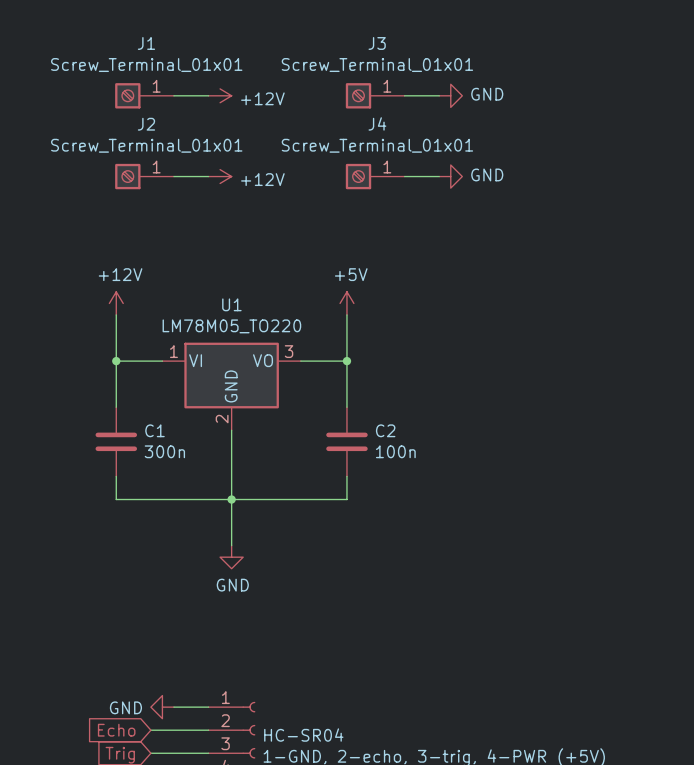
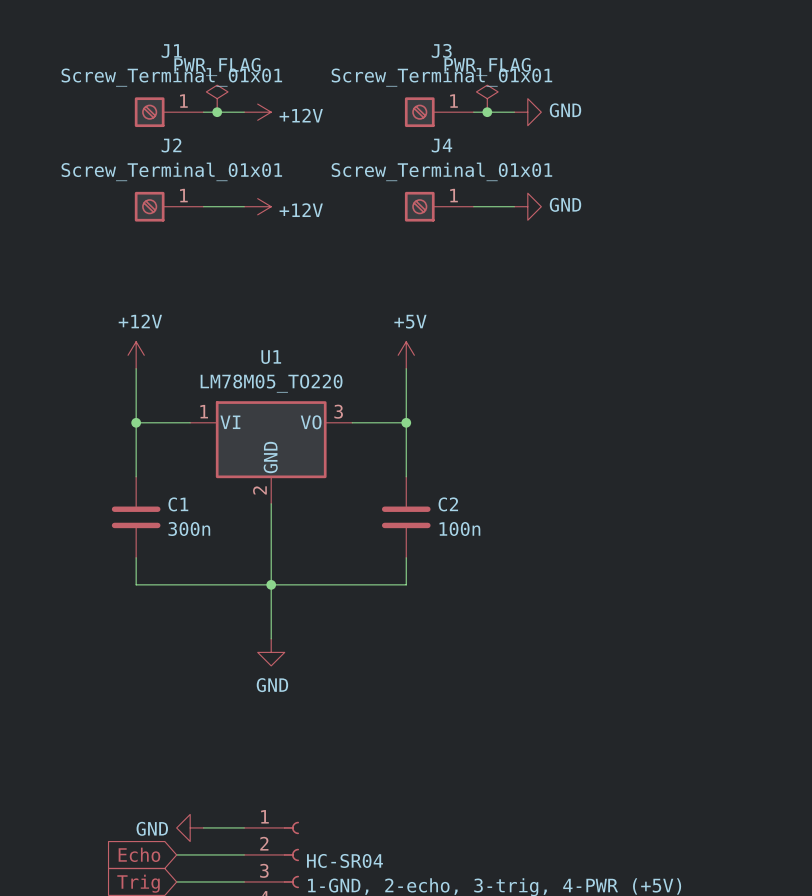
power symbol: none -> PWR_FLAG (217, 98)
power symbol: none -> PWR_FLAG (487, 98)
junction: none -> (217, 112)
junction: none -> (487, 112)

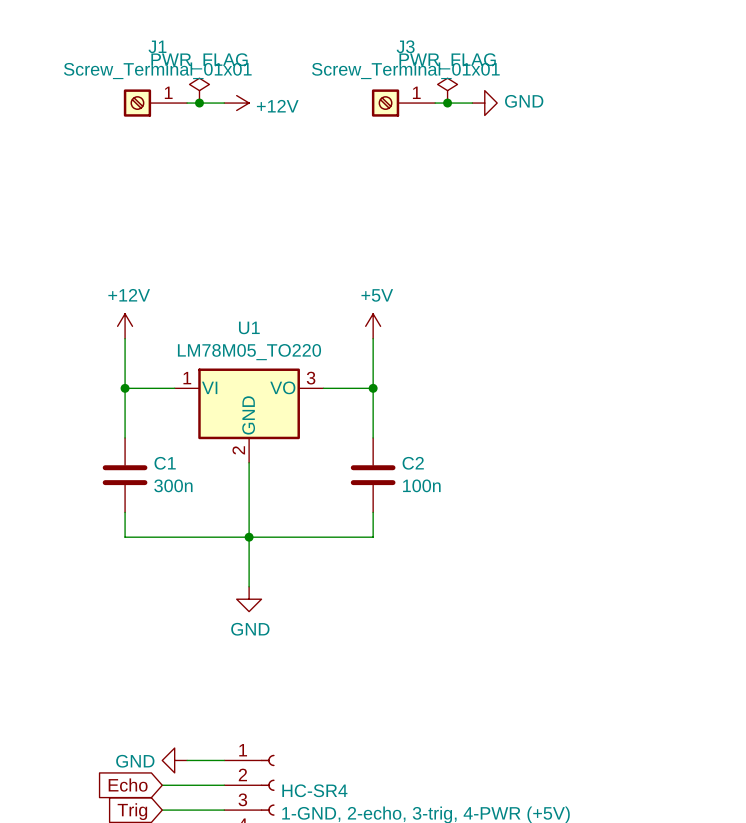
J2: Screw_Terminal_01x01 (169, 206) -> none
wire: (203, 206) (244, 206) -> none
power symbol: +12V (257, 206) -> none
J4: Screw_Terminal_01x01 (439, 206) -> none
wire: (473, 206) (514, 206) -> none
power symbol: GND (527, 206) -> none
HC-SR04 name: HC-SR04 (344, 860) -> HC-SR4 (314, 790)

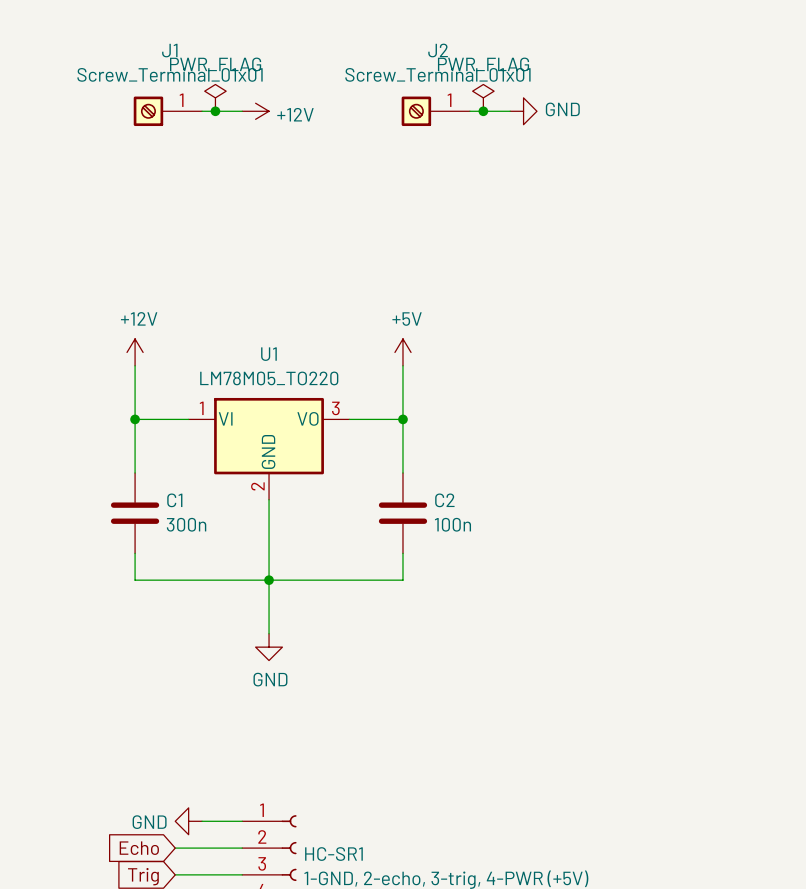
J3 name: J3 (405, 46) -> J2 (438, 50)
HC-SR4 name: HC-SR4 (314, 790) -> HC-SR1 (333, 854)

